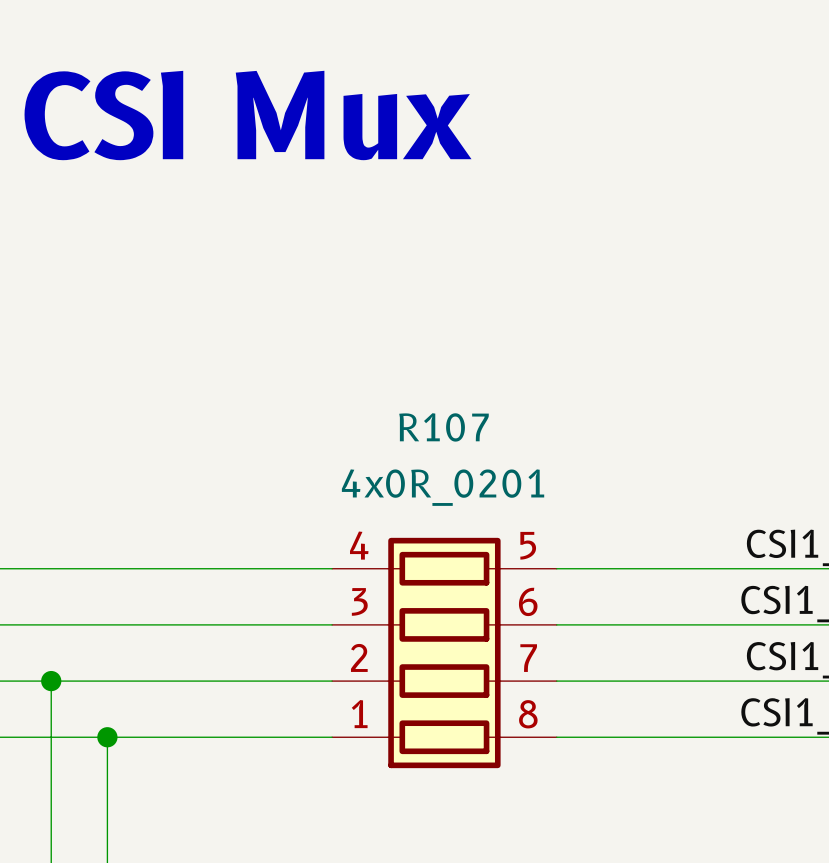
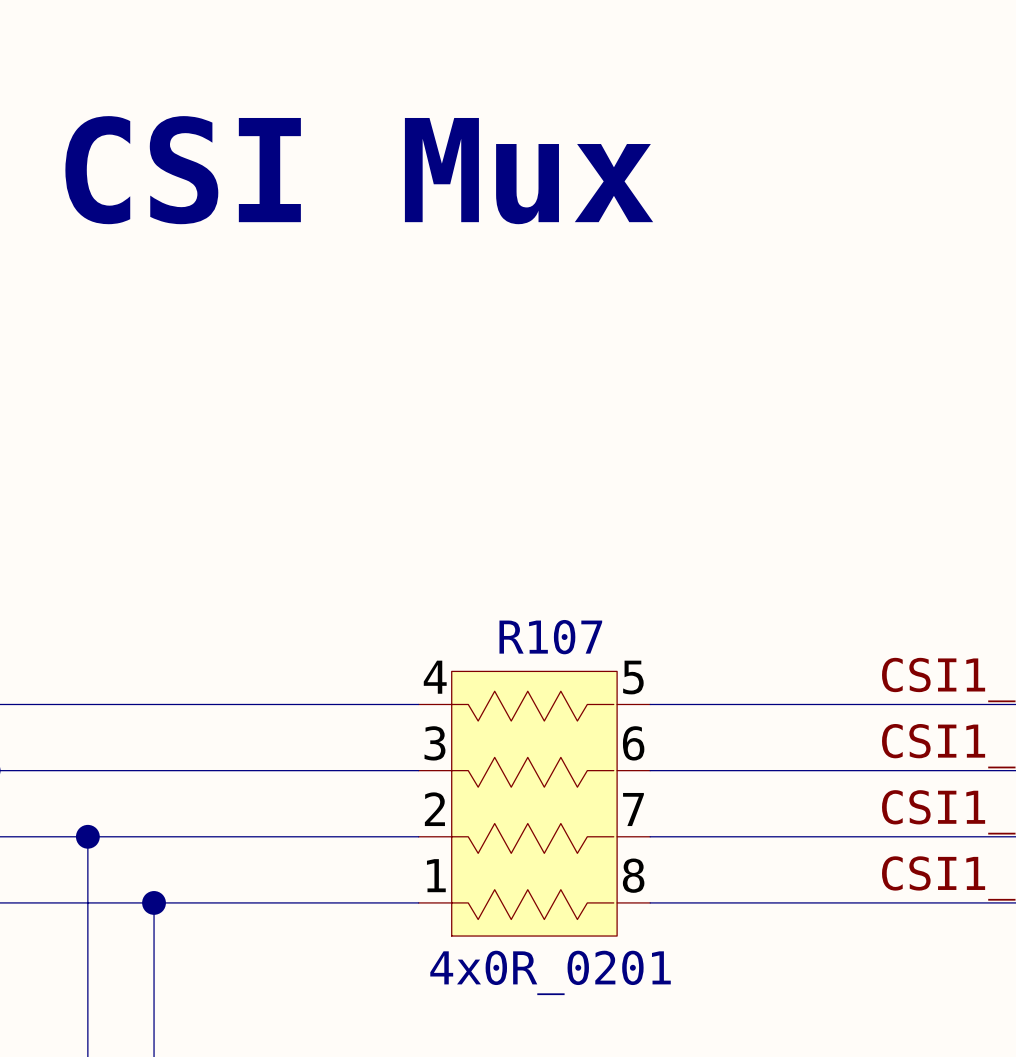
R107 name position: R107 (444, 427) -> R107 (550, 637)
R107 text position: 4x0R_0201 (443, 487) -> 4x0R_0201 (550, 972)
R107 symbol: [332, 537, 557, 769] -> [418, 671, 651, 937]

